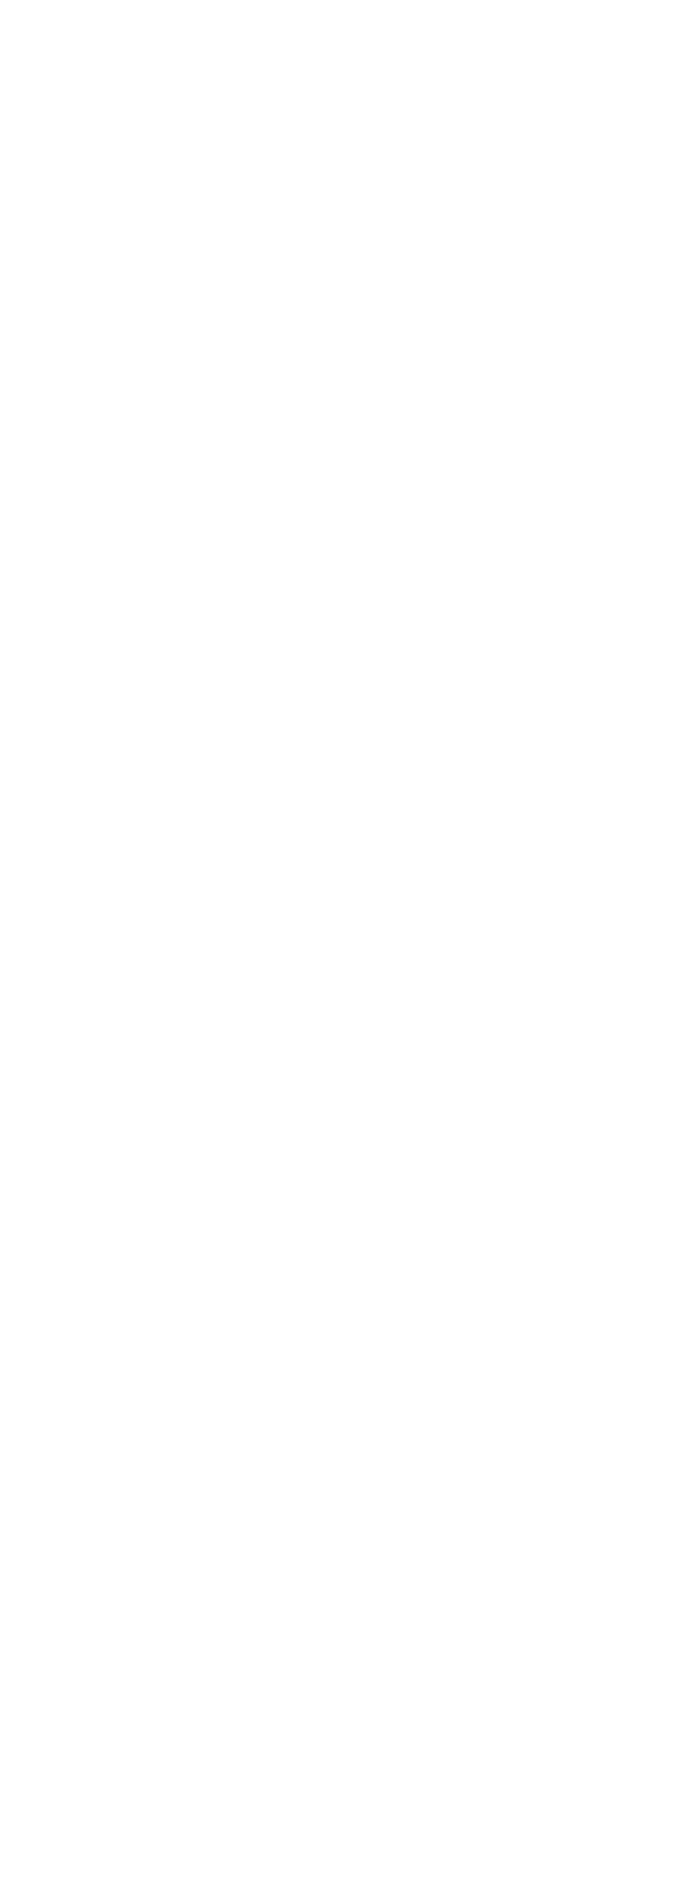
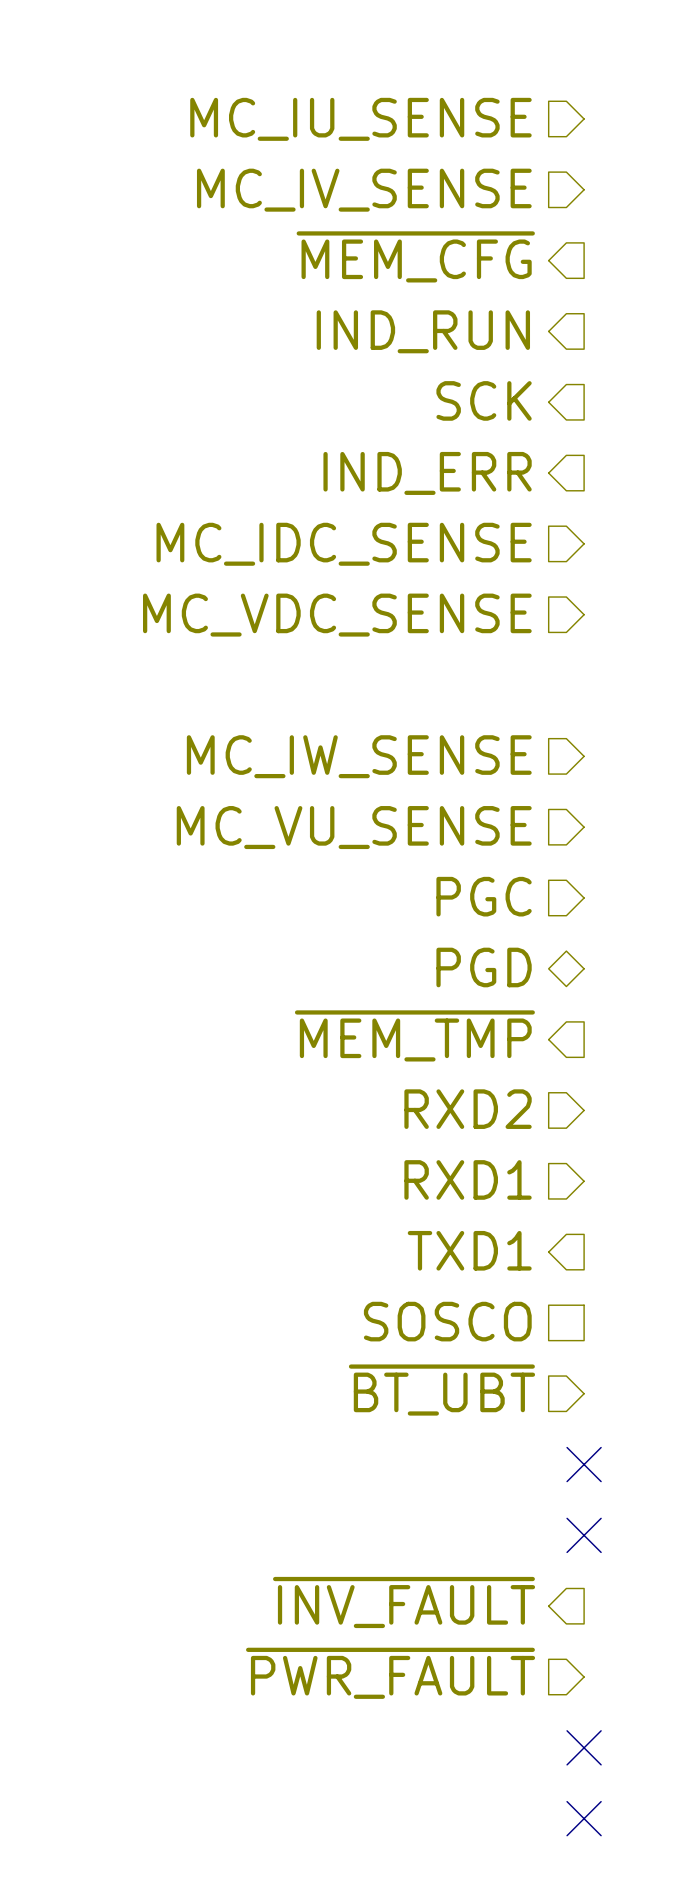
hierarchical label: none -> MC_IU_SENSE (360, 119)
hierarchical label: none -> MC_IV_SENSE (364, 190)
hierarchical label: none -> ~{MEM_CFG} (415, 256)
hierarchical label: none -> IND_RUN (423, 331)
hierarchical label: none -> SCK (484, 400)
hierarchical label: none -> IND_ERR (427, 473)
hierarchical label: none -> MC_IDC_SENSE (344, 544)
hierarchical label: none -> MC_VDC_SENSE (337, 615)
hierarchical label: none -> MC_IW_SENSE (359, 756)
hierarchical label: none -> MC_VU_SENSE (354, 827)
hierarchical label: none -> PGC (484, 896)
hierarchical label: none -> PGD (484, 967)
hierarchical label: none -> ~{MEM_TMP} (414, 1035)
hierarchical label: none -> RXD2 (468, 1109)
hierarchical label: none -> RXD1 (468, 1179)
hierarchical label: none -> TXD1 (469, 1250)
hierarchical label: none -> SOSCO (447, 1321)
hierarchical label: none -> ~{BT_UBT} (441, 1390)
no-connect mark: none -> (584, 1464)
no-connect mark: none -> (584, 1535)
hierarchical label: none -> ~{INV_FAULT} (404, 1602)
hierarchical label: none -> ~{PWR_FAULT} (390, 1673)
no-connect mark: none -> (584, 1747)
no-connect mark: none -> (584, 1818)

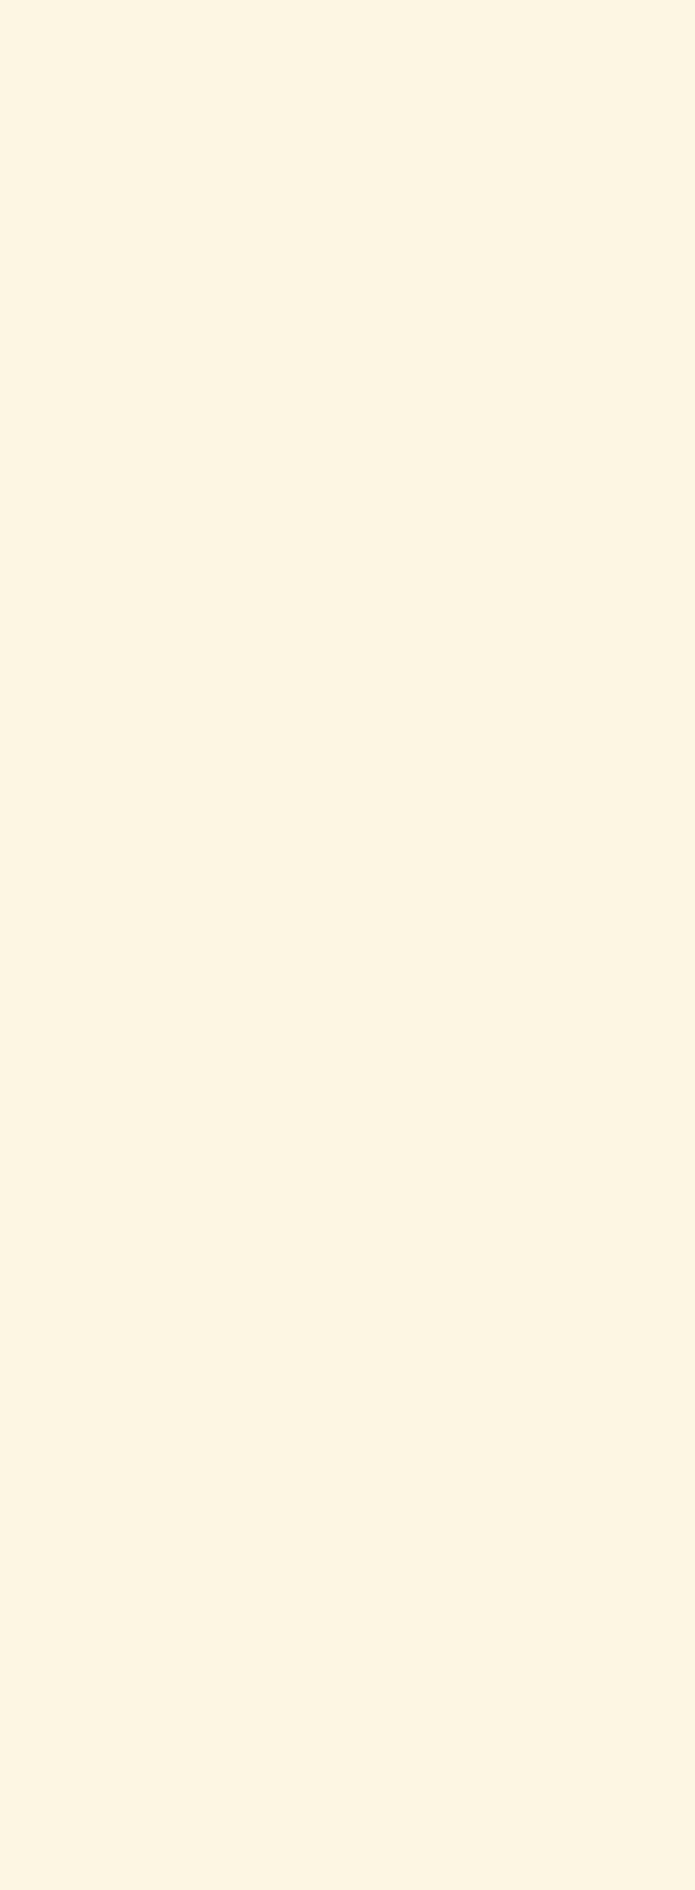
hierarchical label: MC_IU_SENSE (360, 119) -> none
hierarchical label: MC_IV_SENSE (364, 190) -> none
hierarchical label: ~{MEM_CFG} (415, 256) -> none
hierarchical label: IND_RUN (423, 331) -> none
hierarchical label: SCK (484, 400) -> none
hierarchical label: IND_ERR (427, 473) -> none
hierarchical label: MC_IDC_SENSE (344, 544) -> none
hierarchical label: MC_VDC_SENSE (337, 615) -> none
hierarchical label: MC_IW_SENSE (359, 756) -> none
hierarchical label: MC_VU_SENSE (354, 827) -> none
hierarchical label: PGC (484, 896) -> none
hierarchical label: PGD (484, 967) -> none
hierarchical label: ~{MEM_TMP} (414, 1035) -> none
hierarchical label: RXD2 (468, 1109) -> none
hierarchical label: RXD1 (468, 1179) -> none
hierarchical label: TXD1 (469, 1250) -> none
hierarchical label: SOSCO (447, 1321) -> none
hierarchical label: ~{BT_UBT} (441, 1390) -> none
no-connect mark: (584, 1464) -> none
no-connect mark: (584, 1535) -> none
hierarchical label: ~{INV_FAULT} (404, 1602) -> none
hierarchical label: ~{PWR_FAULT} (390, 1673) -> none
no-connect mark: (584, 1747) -> none
no-connect mark: (584, 1818) -> none

